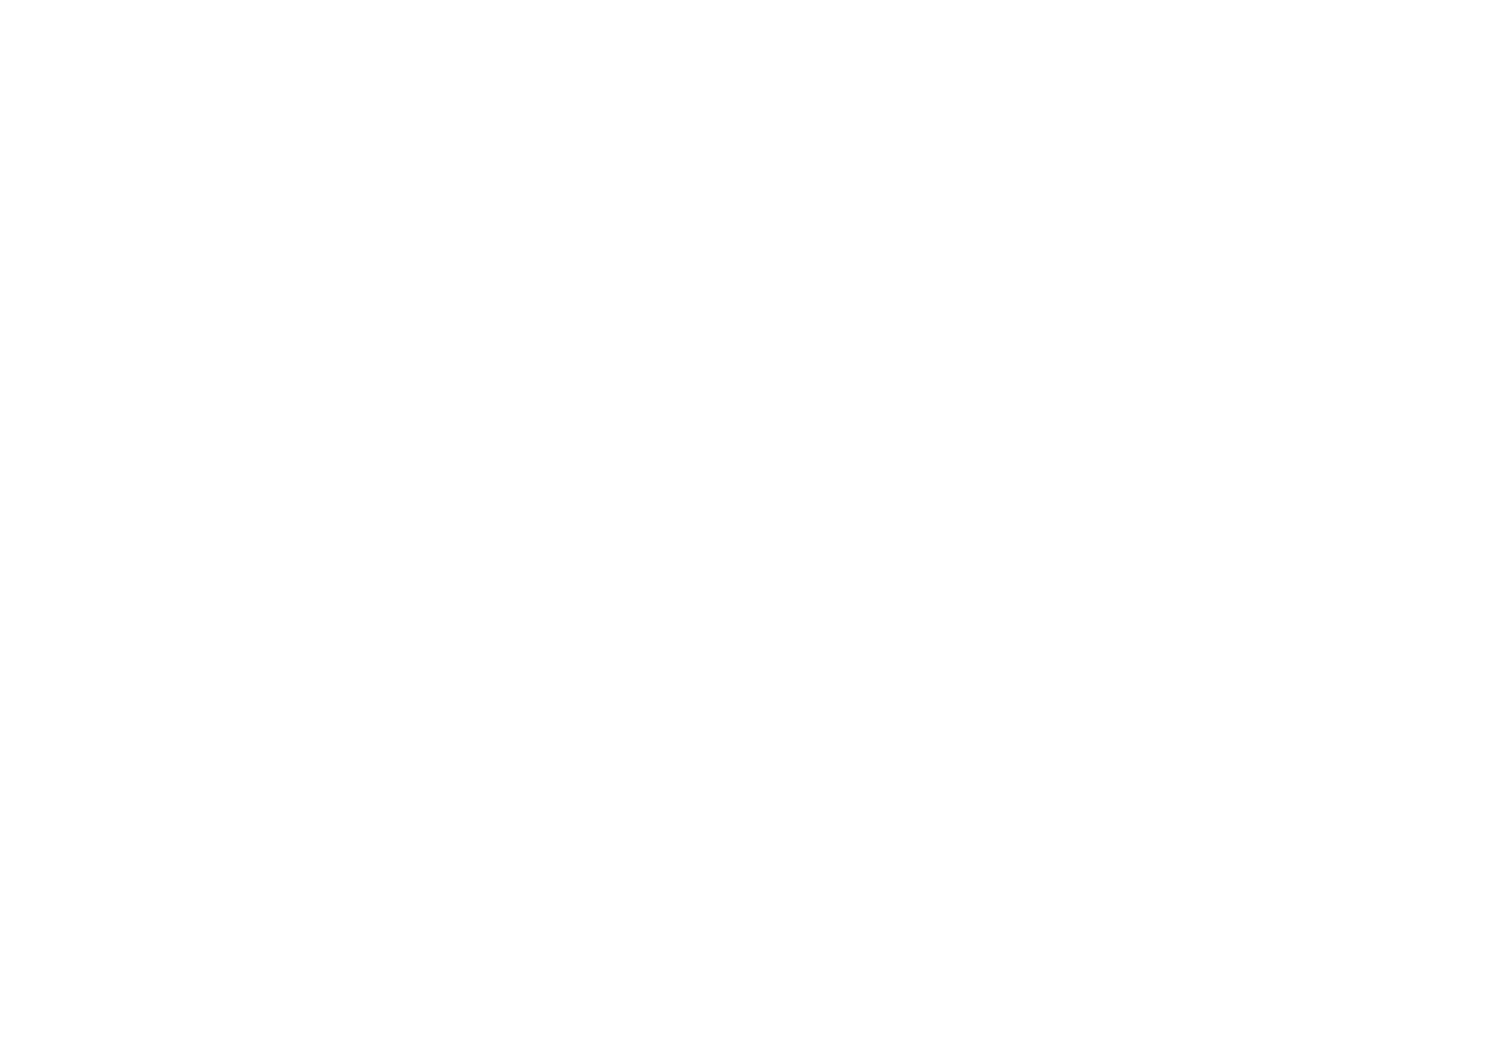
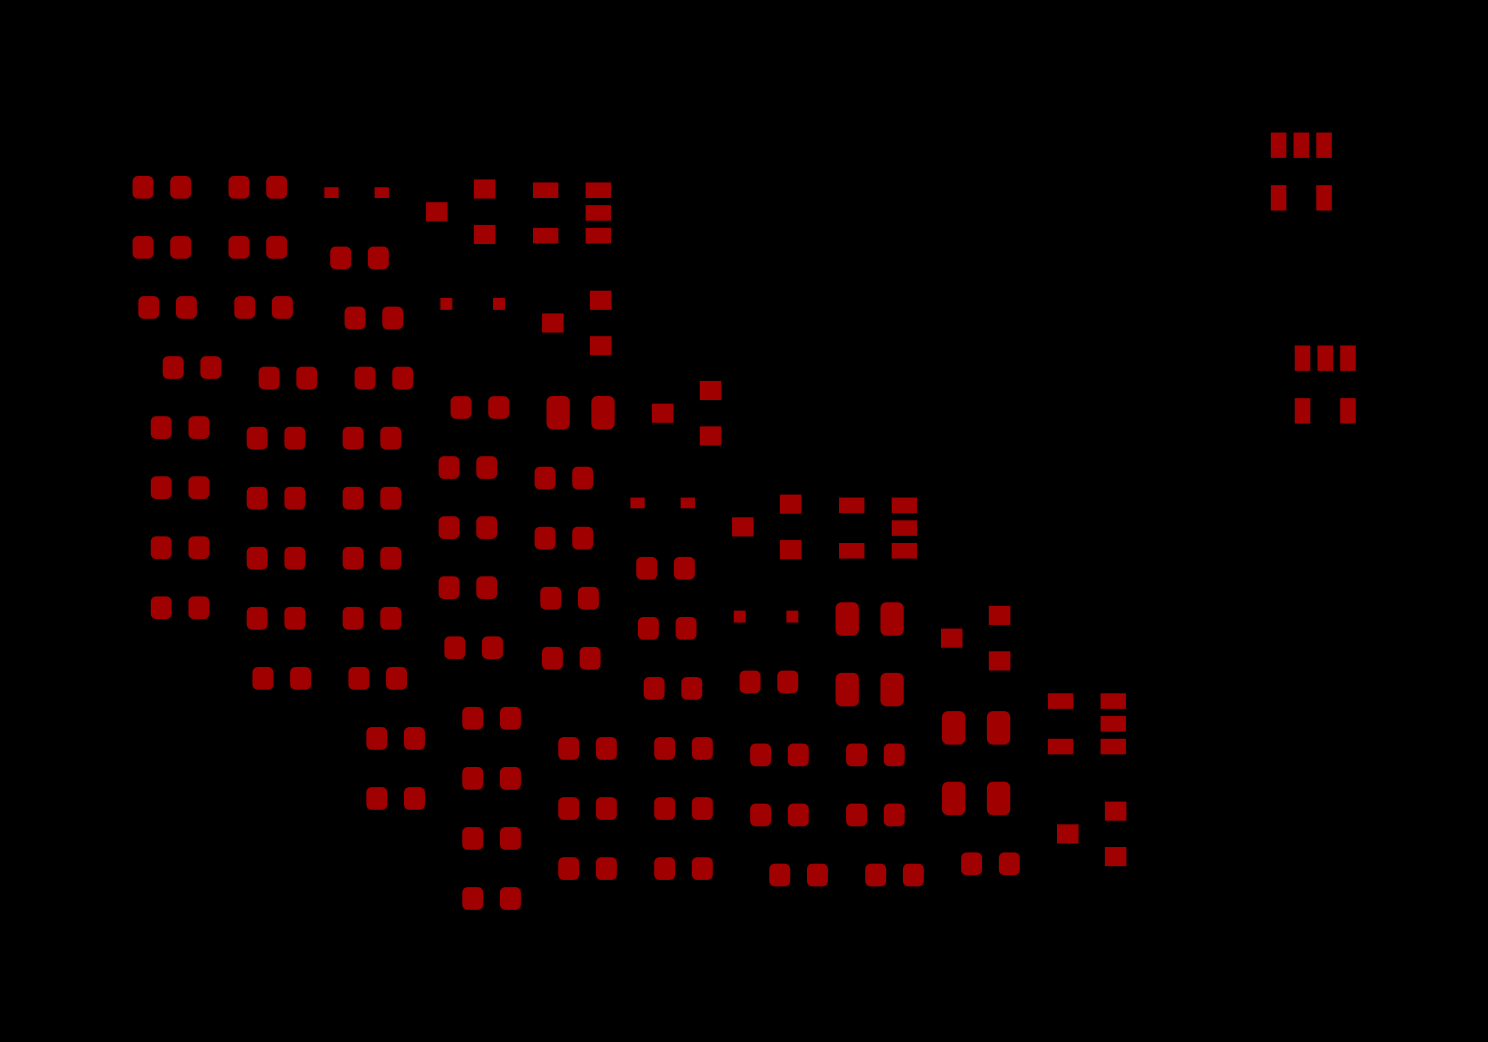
part: none -> (1301, 171)
part: none -> (161, 187)
part: none -> (257, 187)
part: none -> (356, 192)
part: none -> (460, 211)
part: none -> (571, 212)
part: none -> (161, 247)
part: none -> (257, 247)
part: none -> (359, 257)
part: none -> (472, 303)
part: none -> (167, 307)
part: none -> (263, 307)
part: none -> (373, 317)
part: none -> (576, 323)
part: none -> (192, 367)
part: none -> (287, 378)
part: none -> (383, 378)
part: none -> (1325, 384)
part: none -> (479, 407)
part: none -> (580, 412)
part: none -> (686, 413)
part: none -> (180, 427)
part: none -> (275, 438)
part: none -> (371, 438)
part: none -> (467, 467)
part: none -> (563, 478)
part: none -> (180, 487)
part: none -> (275, 498)
part: none -> (371, 498)
part: none -> (662, 502)
part: none -> (766, 526)
part: none -> (467, 527)
part: none -> (878, 528)
part: none -> (563, 538)
part: none -> (180, 547)
part: none -> (275, 558)
part: none -> (371, 558)
part: none -> (665, 568)
part: none -> (467, 587)
part: none -> (569, 598)
part: none -> (180, 607)
part: none -> (766, 616)
part: none -> (275, 618)
part: none -> (371, 618)
part: none -> (869, 619)
part: none -> (667, 628)
part: none -> (975, 638)
part: none -> (473, 647)
part: none -> (571, 658)
part: none -> (281, 678)
part: none -> (377, 678)
part: none -> (768, 681)
part: none -> (672, 688)
part: none -> (869, 689)
part: none -> (491, 718)
part: none -> (1086, 723)
part: none -> (976, 727)
part: none -> (395, 738)
part: none -> (587, 748)
part: none -> (683, 748)
part: none -> (779, 754)
part: none -> (875, 754)
part: none -> (491, 778)
part: none -> (395, 798)
part: none -> (976, 798)
part: none -> (587, 808)
part: none -> (683, 808)
part: none -> (779, 814)
part: none -> (875, 814)
part: none -> (1091, 833)
part: none -> (491, 838)
part: none -> (990, 863)
part: none -> (587, 868)
part: none -> (683, 868)
part: none -> (798, 875)
part: none -> (894, 875)
part: none -> (491, 898)

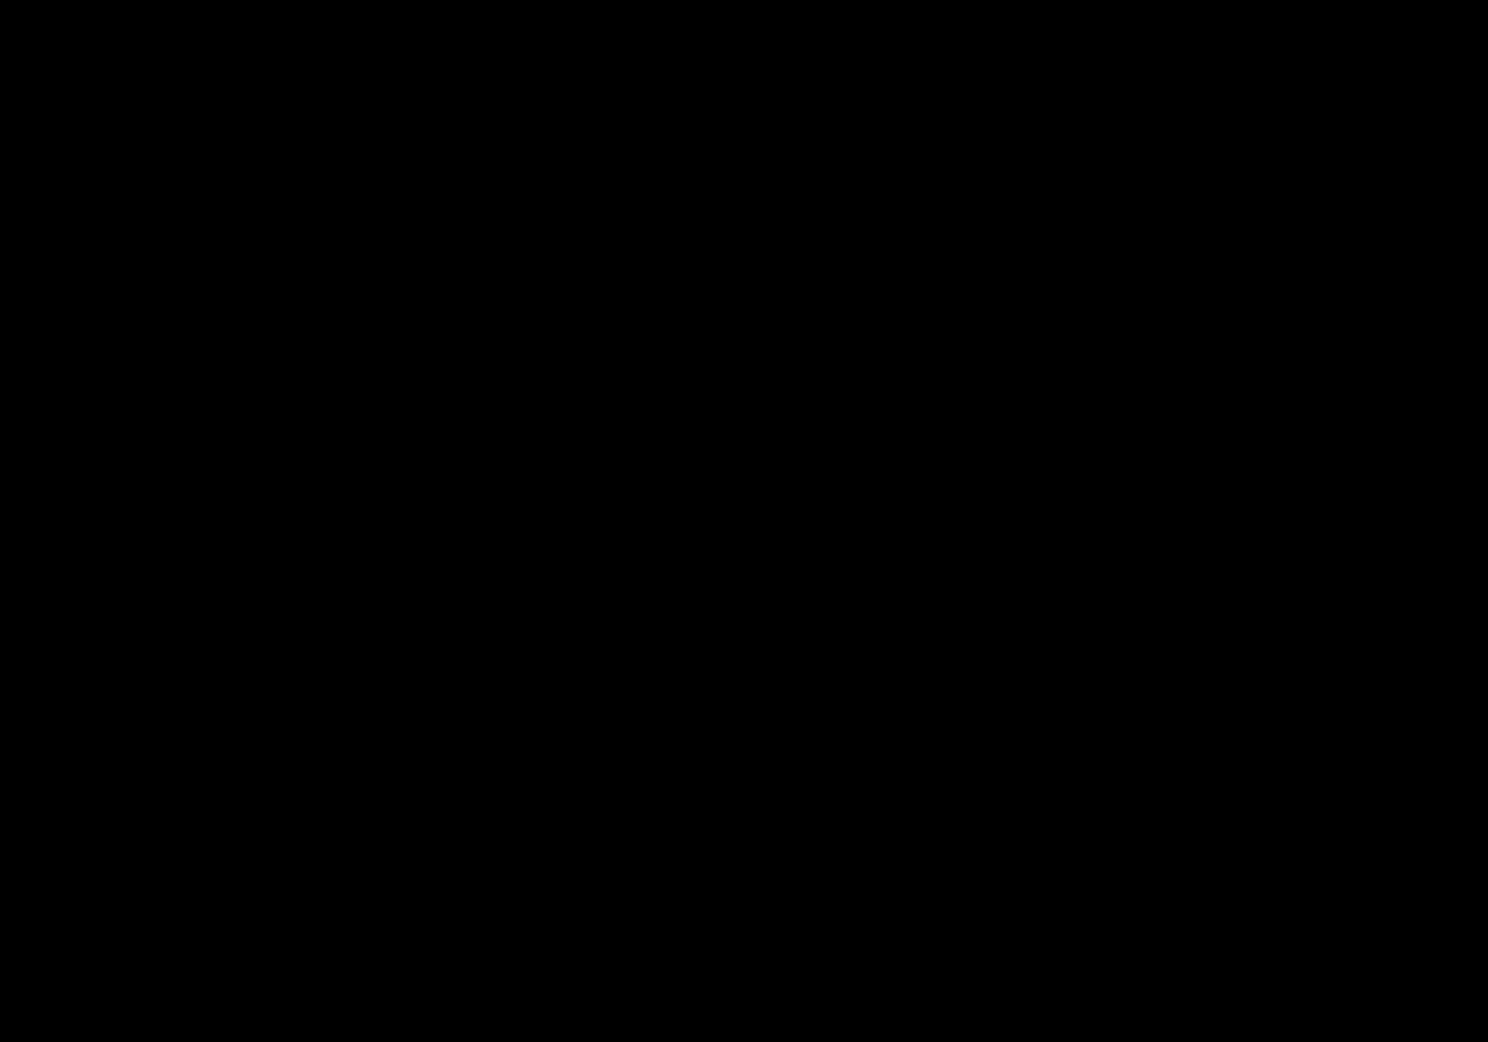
part: (1301, 171) -> none
part: (161, 187) -> none
part: (257, 187) -> none
part: (356, 192) -> none
part: (460, 211) -> none
part: (571, 212) -> none
part: (161, 247) -> none
part: (257, 247) -> none
part: (359, 257) -> none
part: (472, 303) -> none
part: (167, 307) -> none
part: (263, 307) -> none
part: (373, 317) -> none
part: (576, 323) -> none
part: (192, 367) -> none
part: (287, 378) -> none
part: (383, 378) -> none
part: (1325, 384) -> none
part: (479, 407) -> none
part: (580, 412) -> none
part: (686, 413) -> none
part: (180, 427) -> none
part: (275, 438) -> none
part: (371, 438) -> none
part: (467, 467) -> none
part: (563, 478) -> none
part: (180, 487) -> none
part: (275, 498) -> none
part: (371, 498) -> none
part: (662, 502) -> none
part: (766, 526) -> none
part: (467, 527) -> none
part: (878, 528) -> none
part: (563, 538) -> none
part: (180, 547) -> none
part: (275, 558) -> none
part: (371, 558) -> none
part: (665, 568) -> none
part: (467, 587) -> none
part: (569, 598) -> none
part: (180, 607) -> none
part: (766, 616) -> none
part: (275, 618) -> none
part: (371, 618) -> none
part: (869, 619) -> none
part: (667, 628) -> none
part: (975, 638) -> none
part: (473, 647) -> none
part: (571, 658) -> none
part: (281, 678) -> none
part: (377, 678) -> none
part: (768, 681) -> none
part: (672, 688) -> none
part: (869, 689) -> none
part: (491, 718) -> none
part: (1086, 723) -> none
part: (976, 727) -> none
part: (395, 738) -> none
part: (587, 748) -> none
part: (683, 748) -> none
part: (779, 754) -> none
part: (875, 754) -> none
part: (491, 778) -> none
part: (395, 798) -> none
part: (976, 798) -> none
part: (587, 808) -> none
part: (683, 808) -> none
part: (779, 814) -> none
part: (875, 814) -> none
part: (1091, 833) -> none
part: (491, 838) -> none
part: (990, 863) -> none
part: (587, 868) -> none
part: (683, 868) -> none
part: (798, 875) -> none
part: (894, 875) -> none
part: (491, 898) -> none

